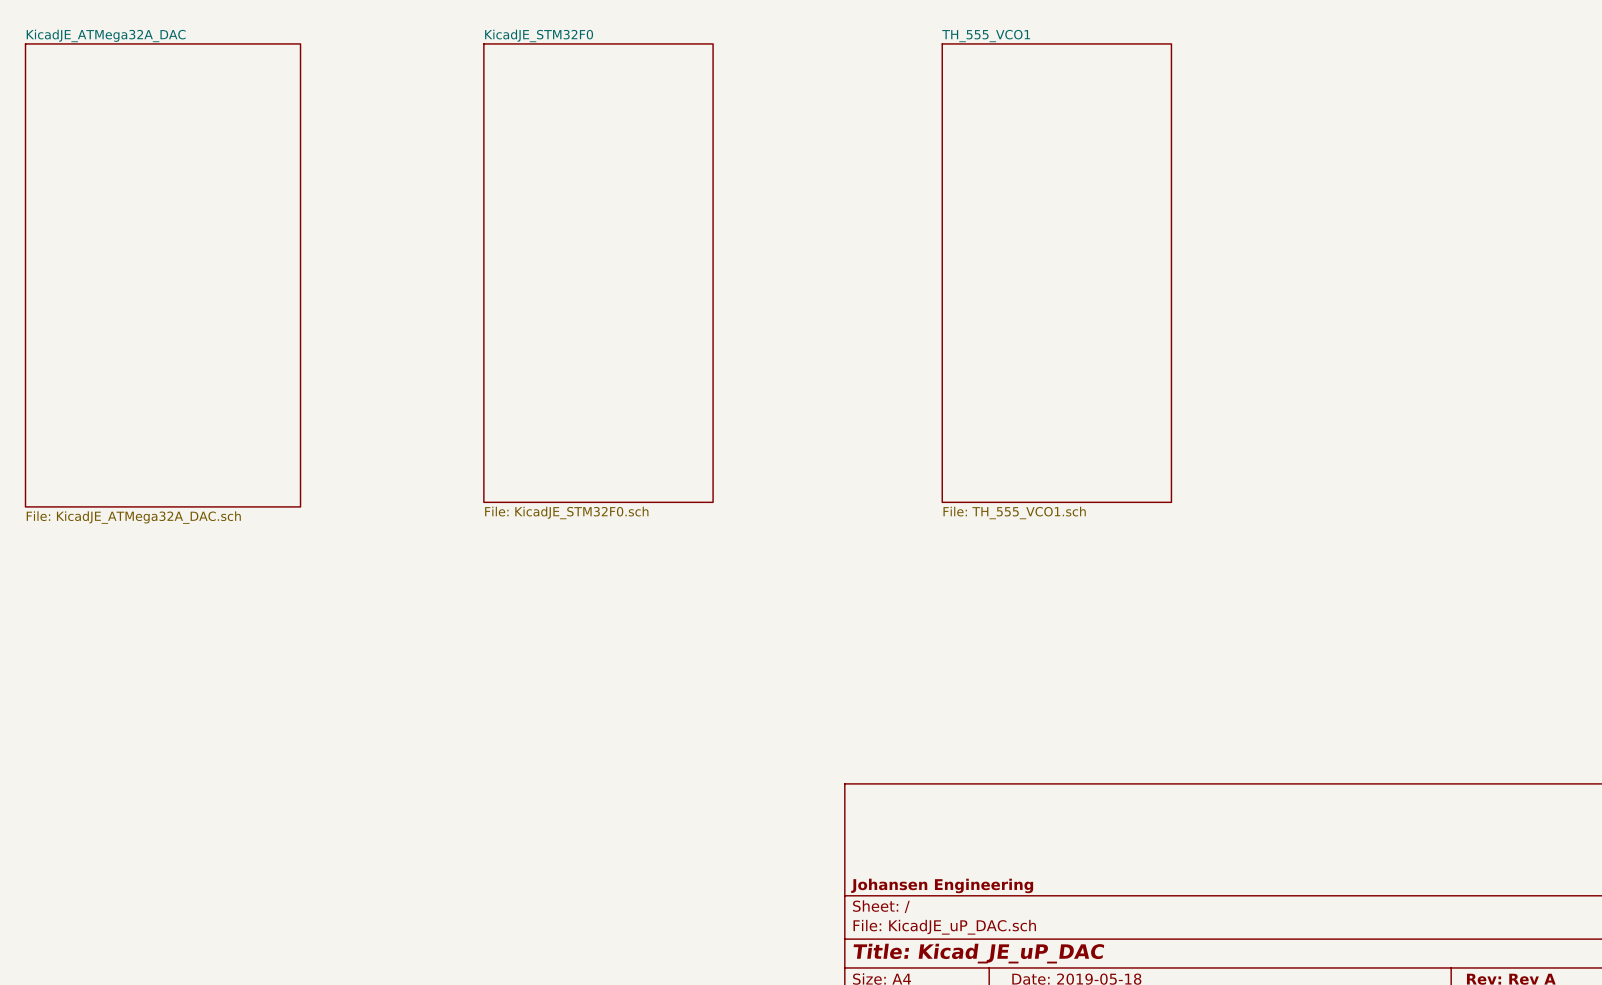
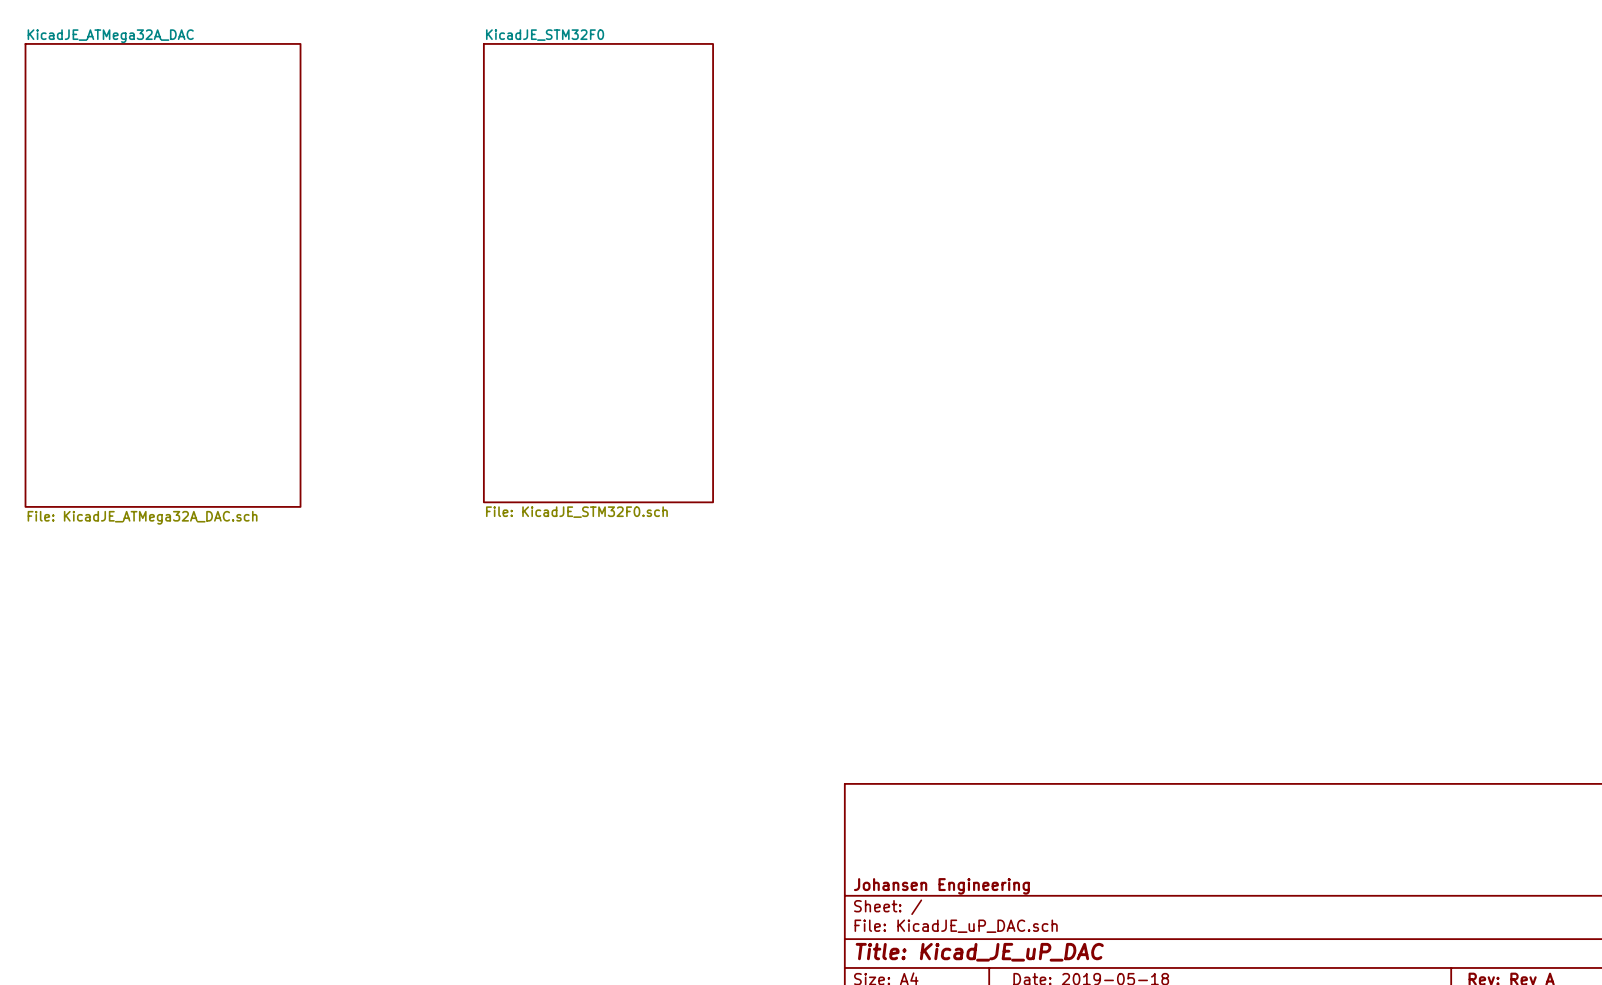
sheet TH_555_VCO1: File: TH_555_VCO1.sch (1056, 273) -> none

